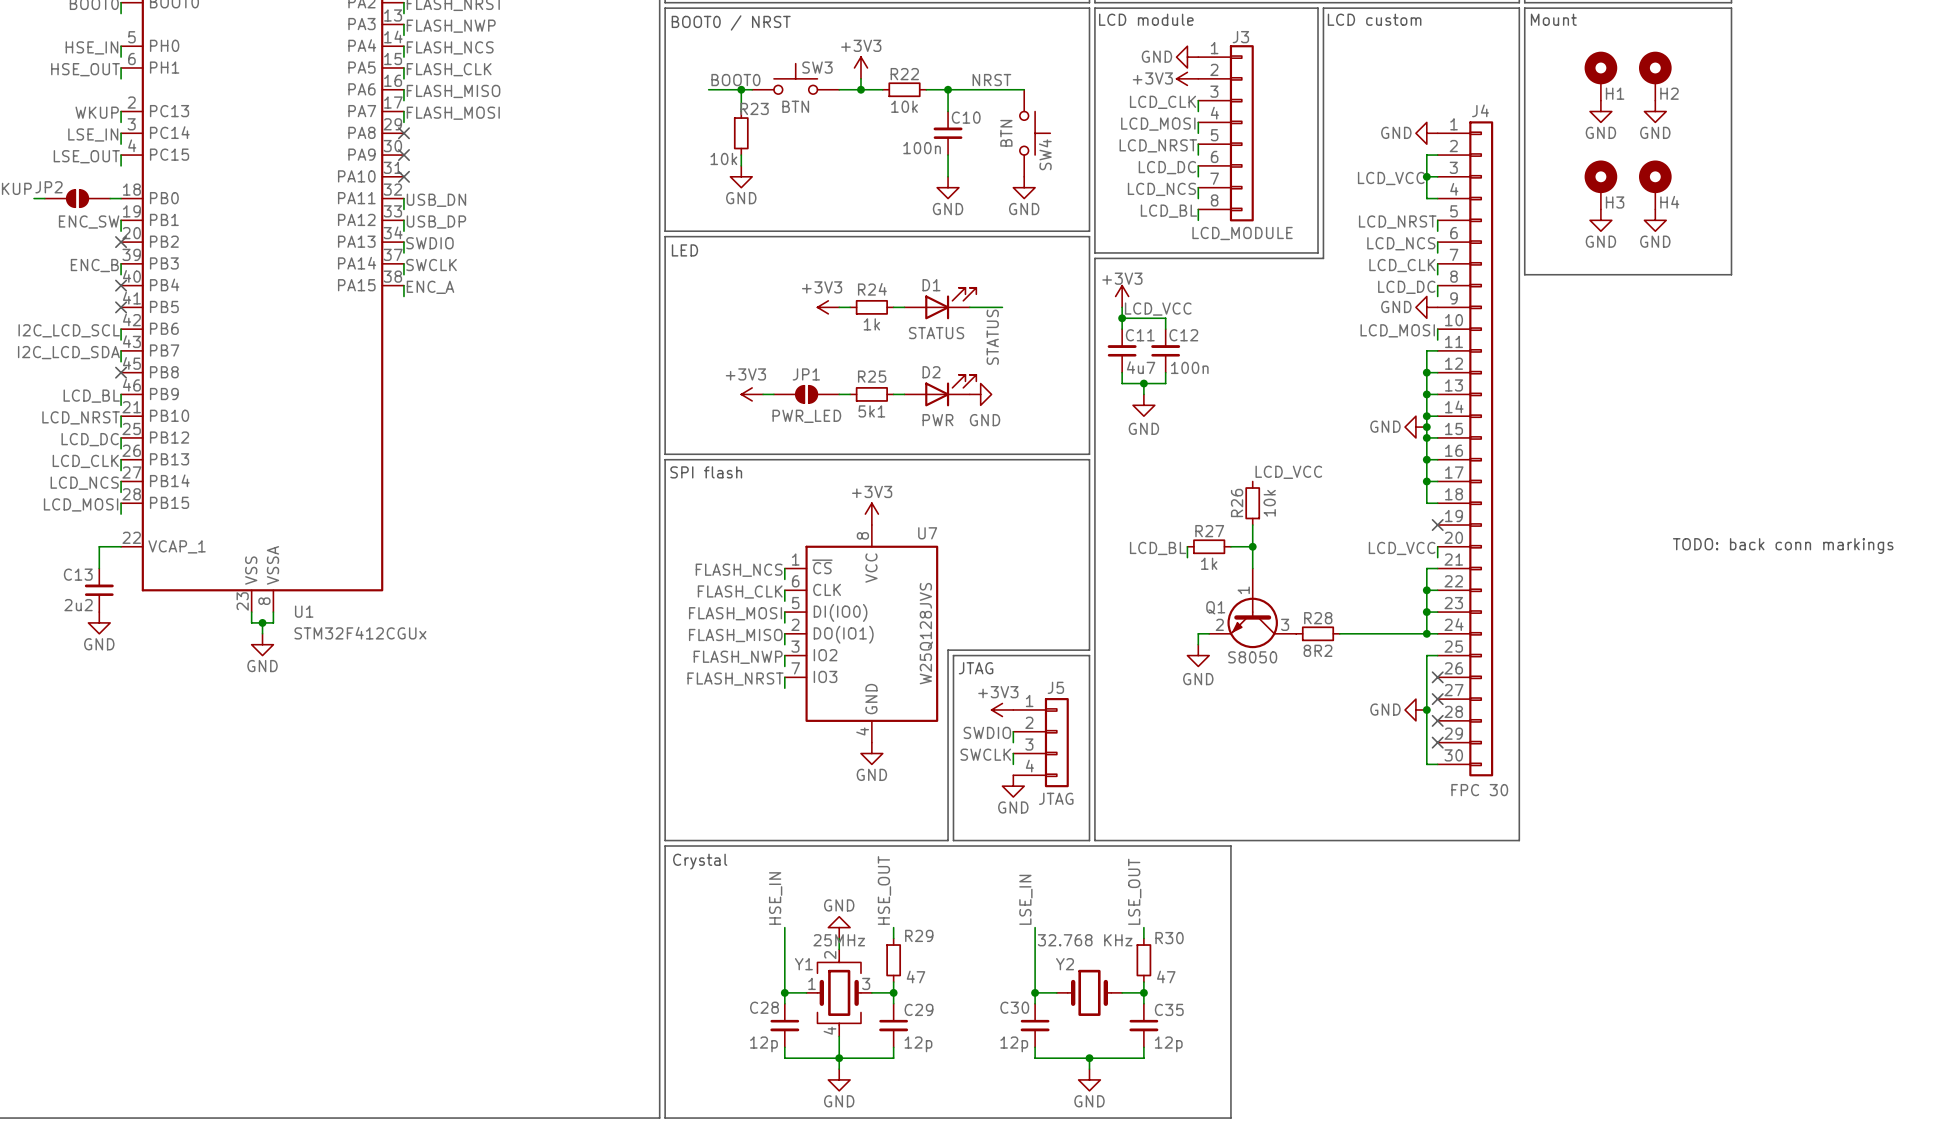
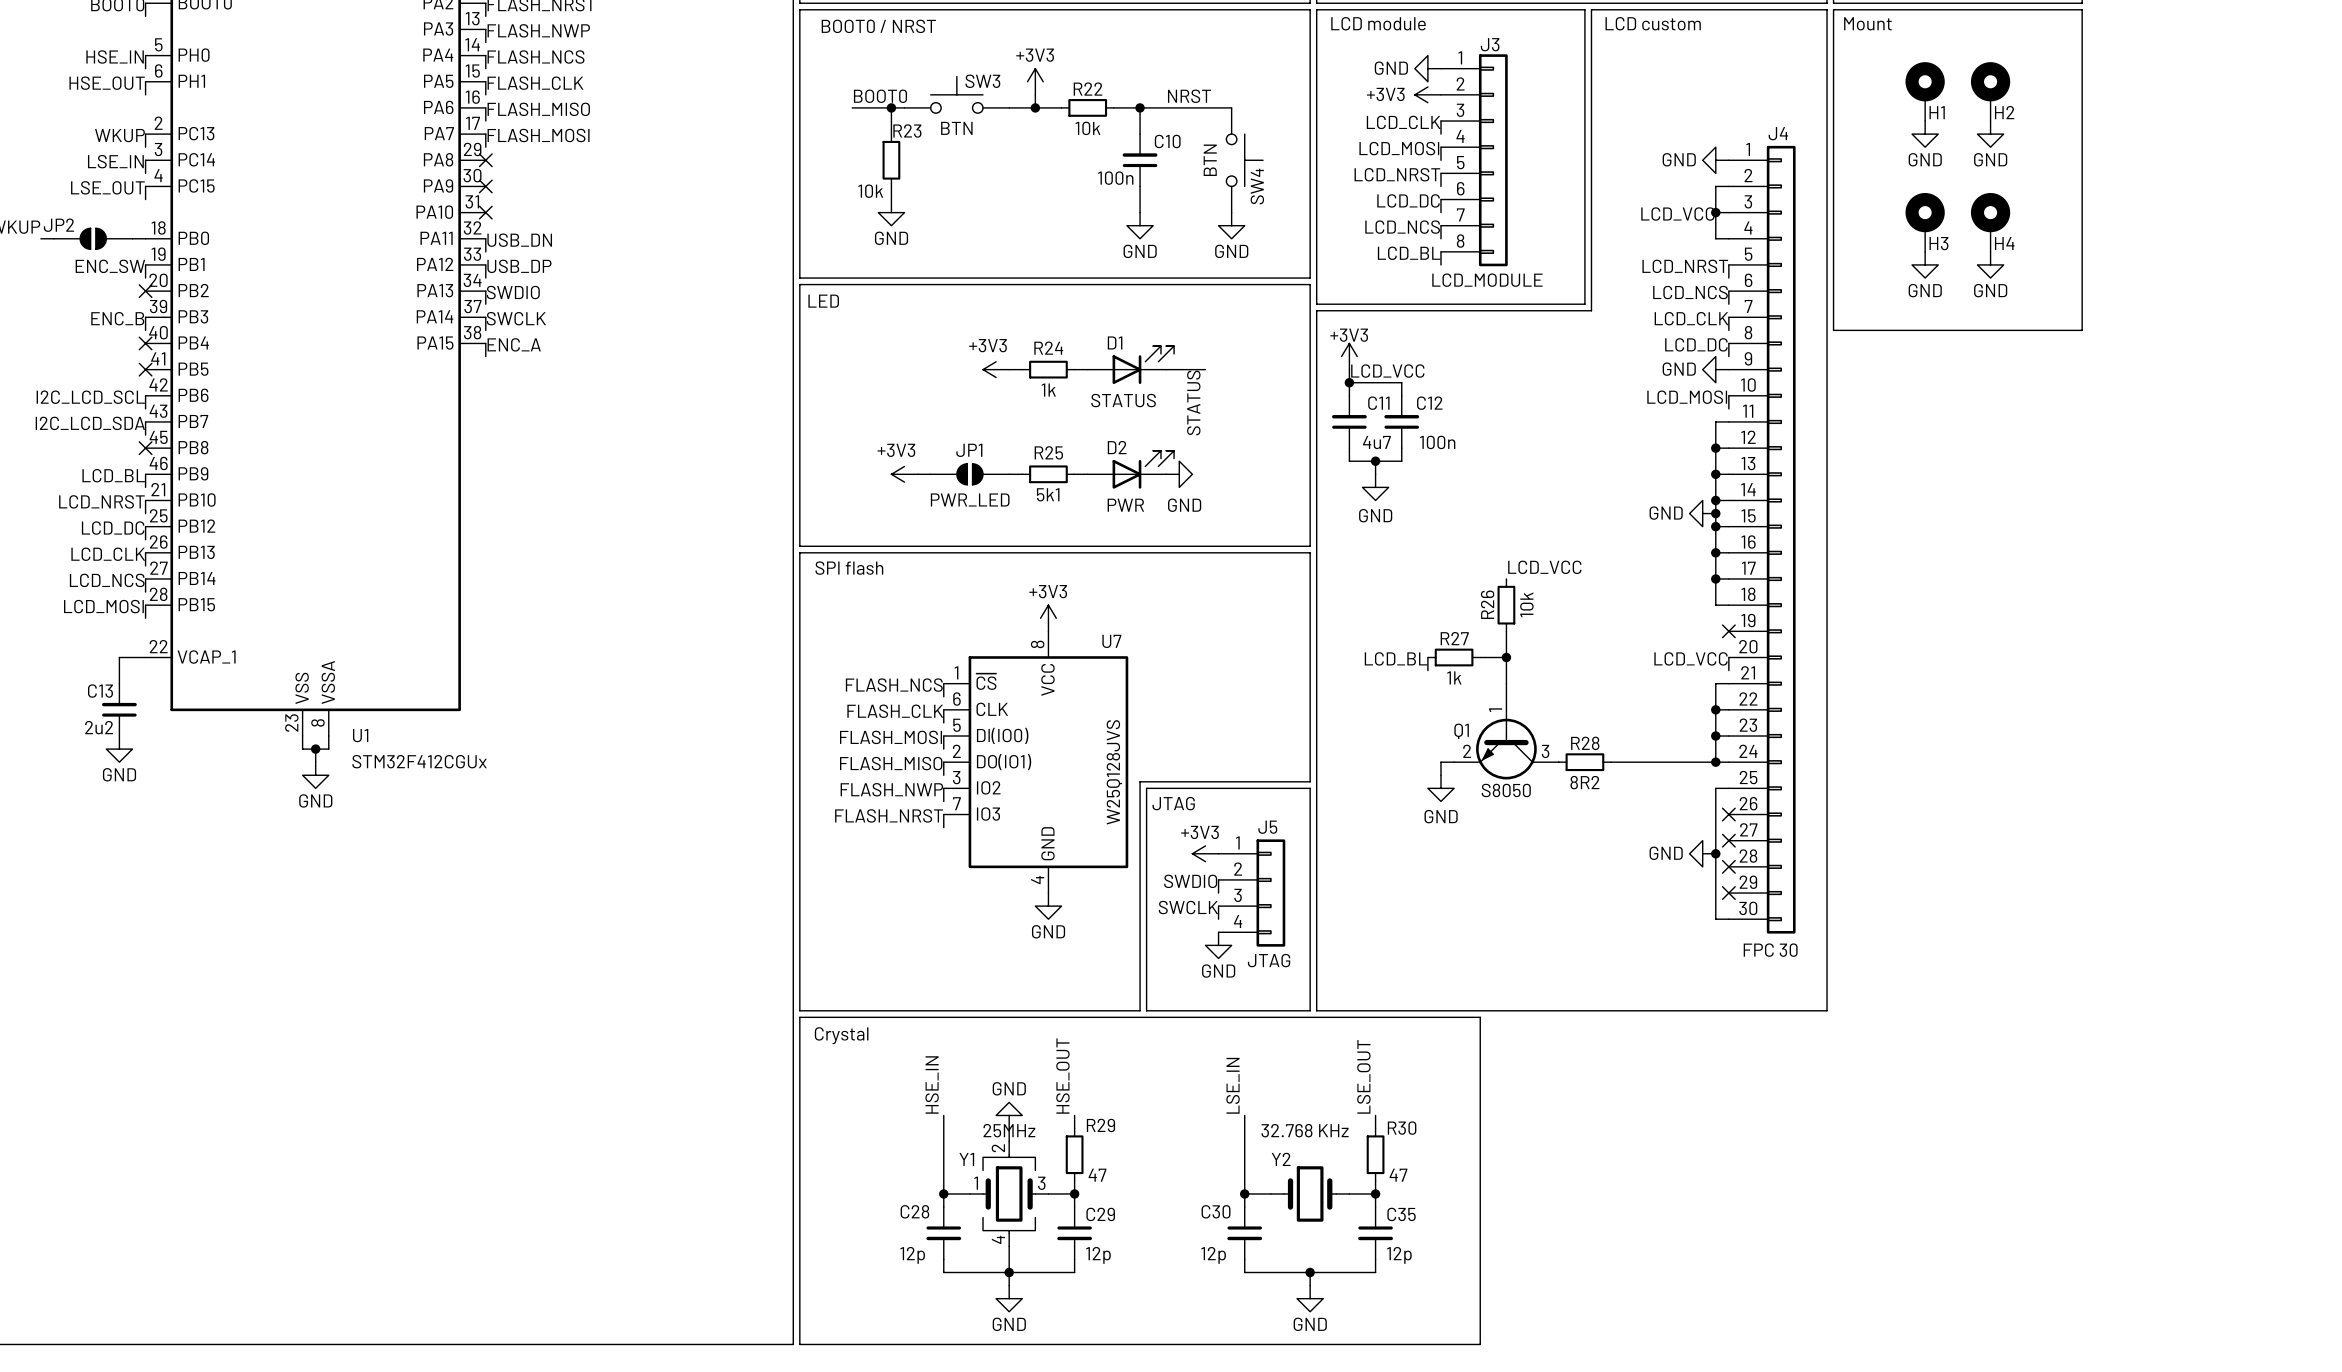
text: TODO: back conn markings (1783, 546) -> none

